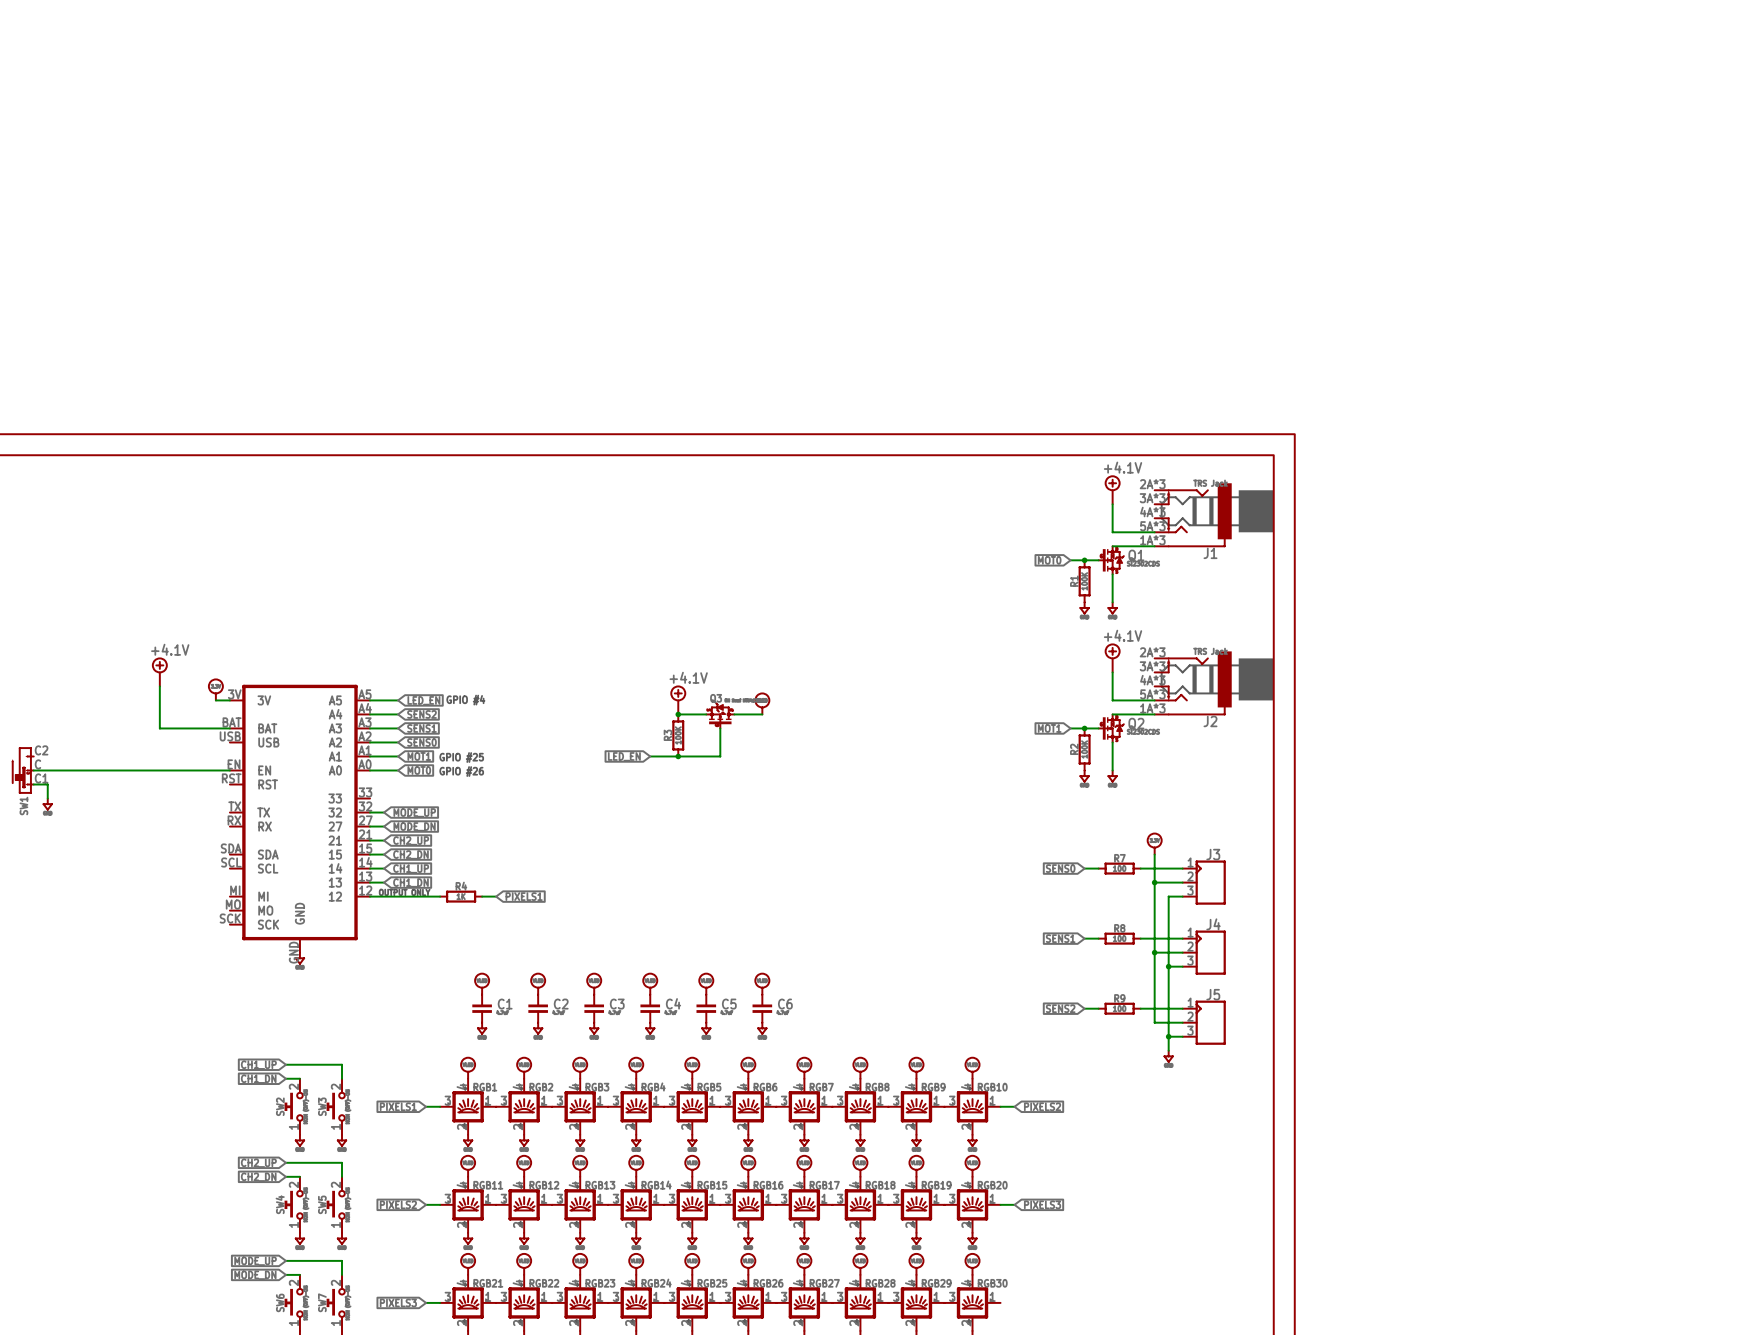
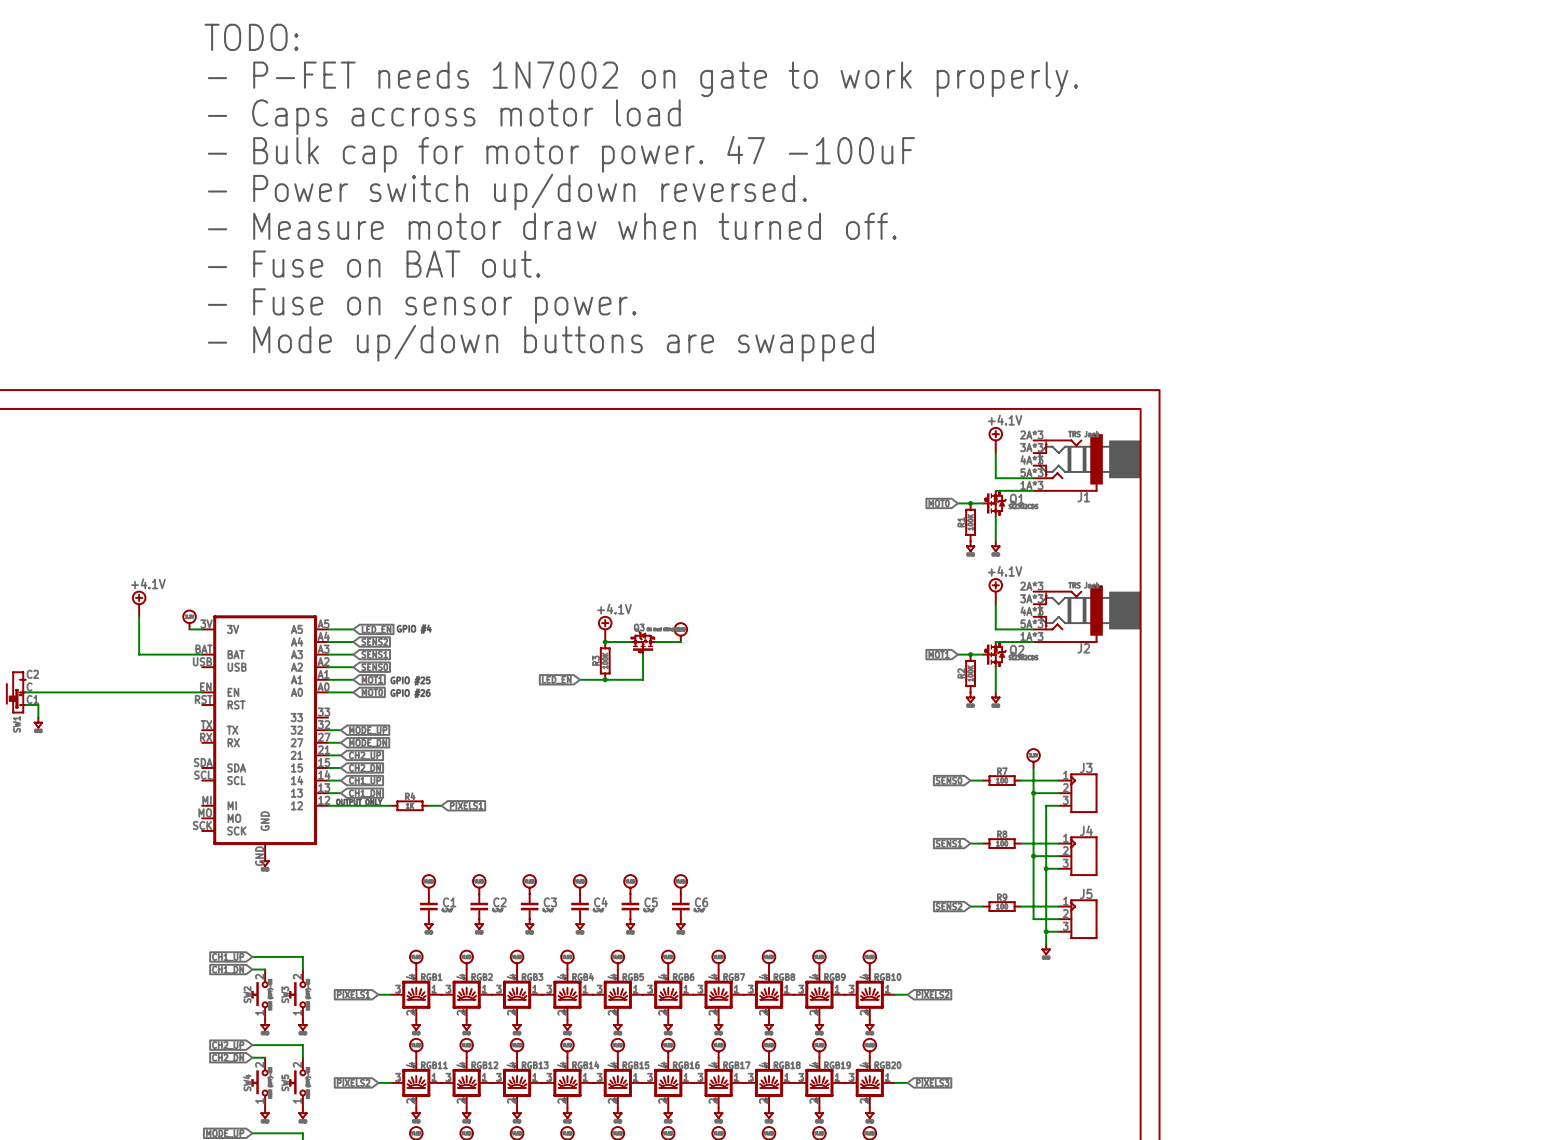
text: none -> TODO: (251, 37)
text: none -> - P-FET needs 1N7002 on gate to work properly. (642, 79)
text: none -> - Caps accross motor load (444, 117)
text: none -> - Bulk cap for motor power. 47 -100uF (561, 154)
text: none -> - Power switch up/down reversed. (507, 192)
text: none -> - Measure motor draw when turned off. (552, 226)
text: none -> - Fuse on BAT out. (374, 264)
text: none -> - Fuse on sensor power. (422, 306)
text: none -> - Mode up/down buttons are swapped (540, 343)

